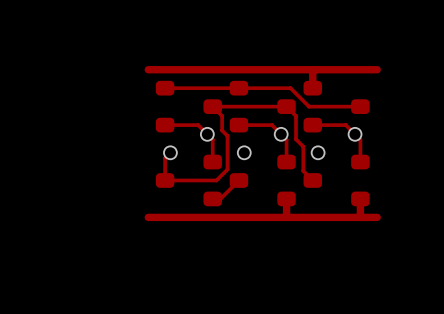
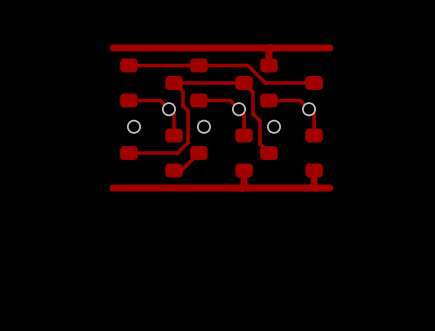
top track: (170, 152) (165, 158) (165, 180) -> none

